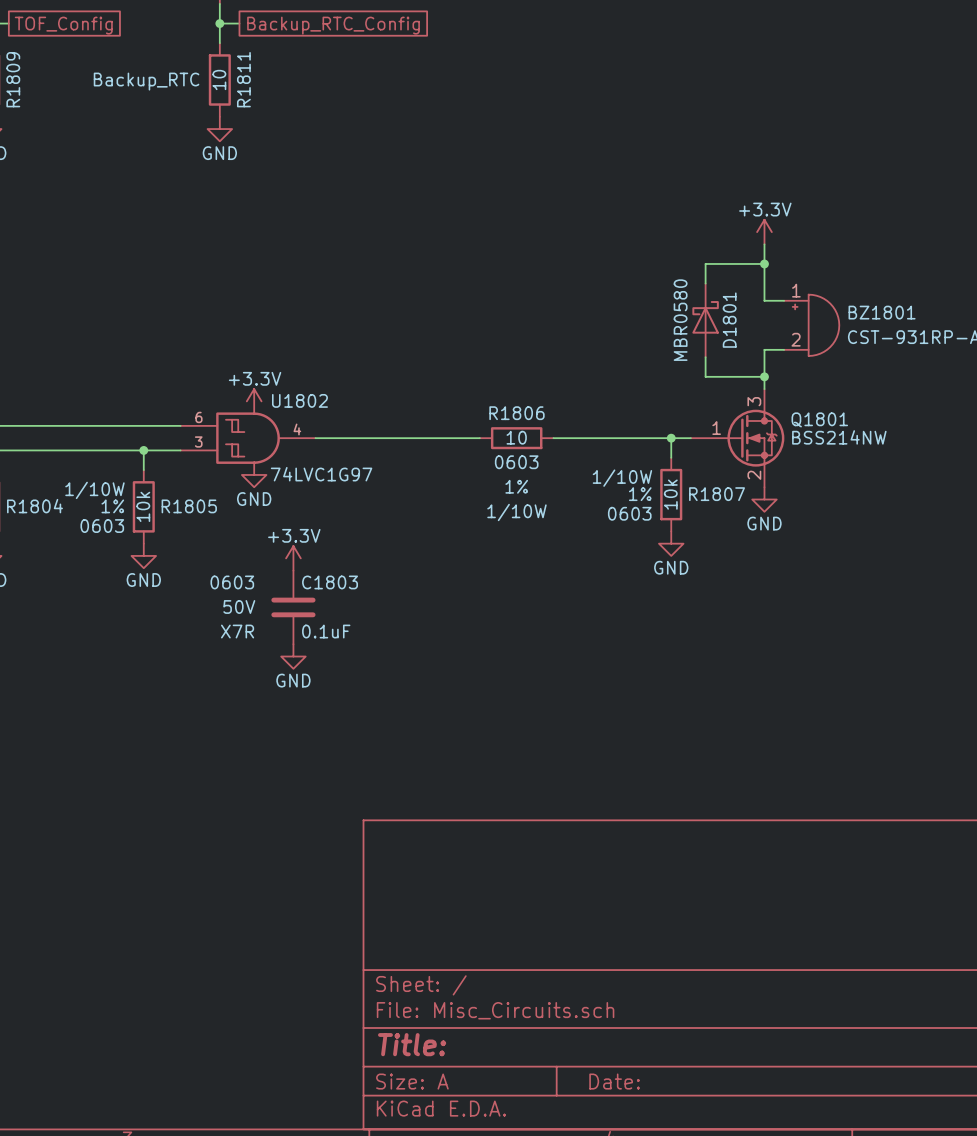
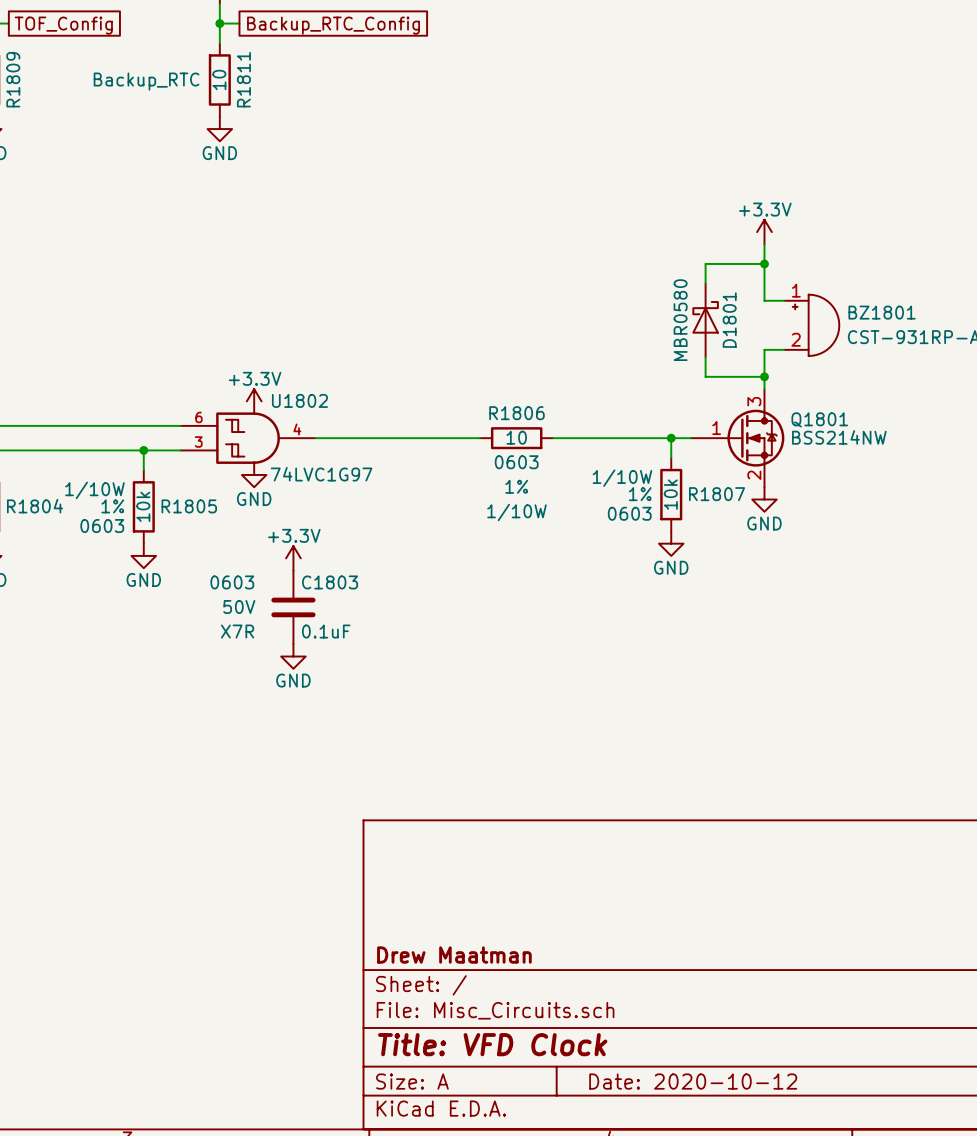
title block: none -> Drew Maatman (454, 955)
title block: Title: (412, 1044) -> Title: VFD Clock (492, 1044)
title block: Date: (614, 1081) -> Date: 2020-10-12 (693, 1081)

